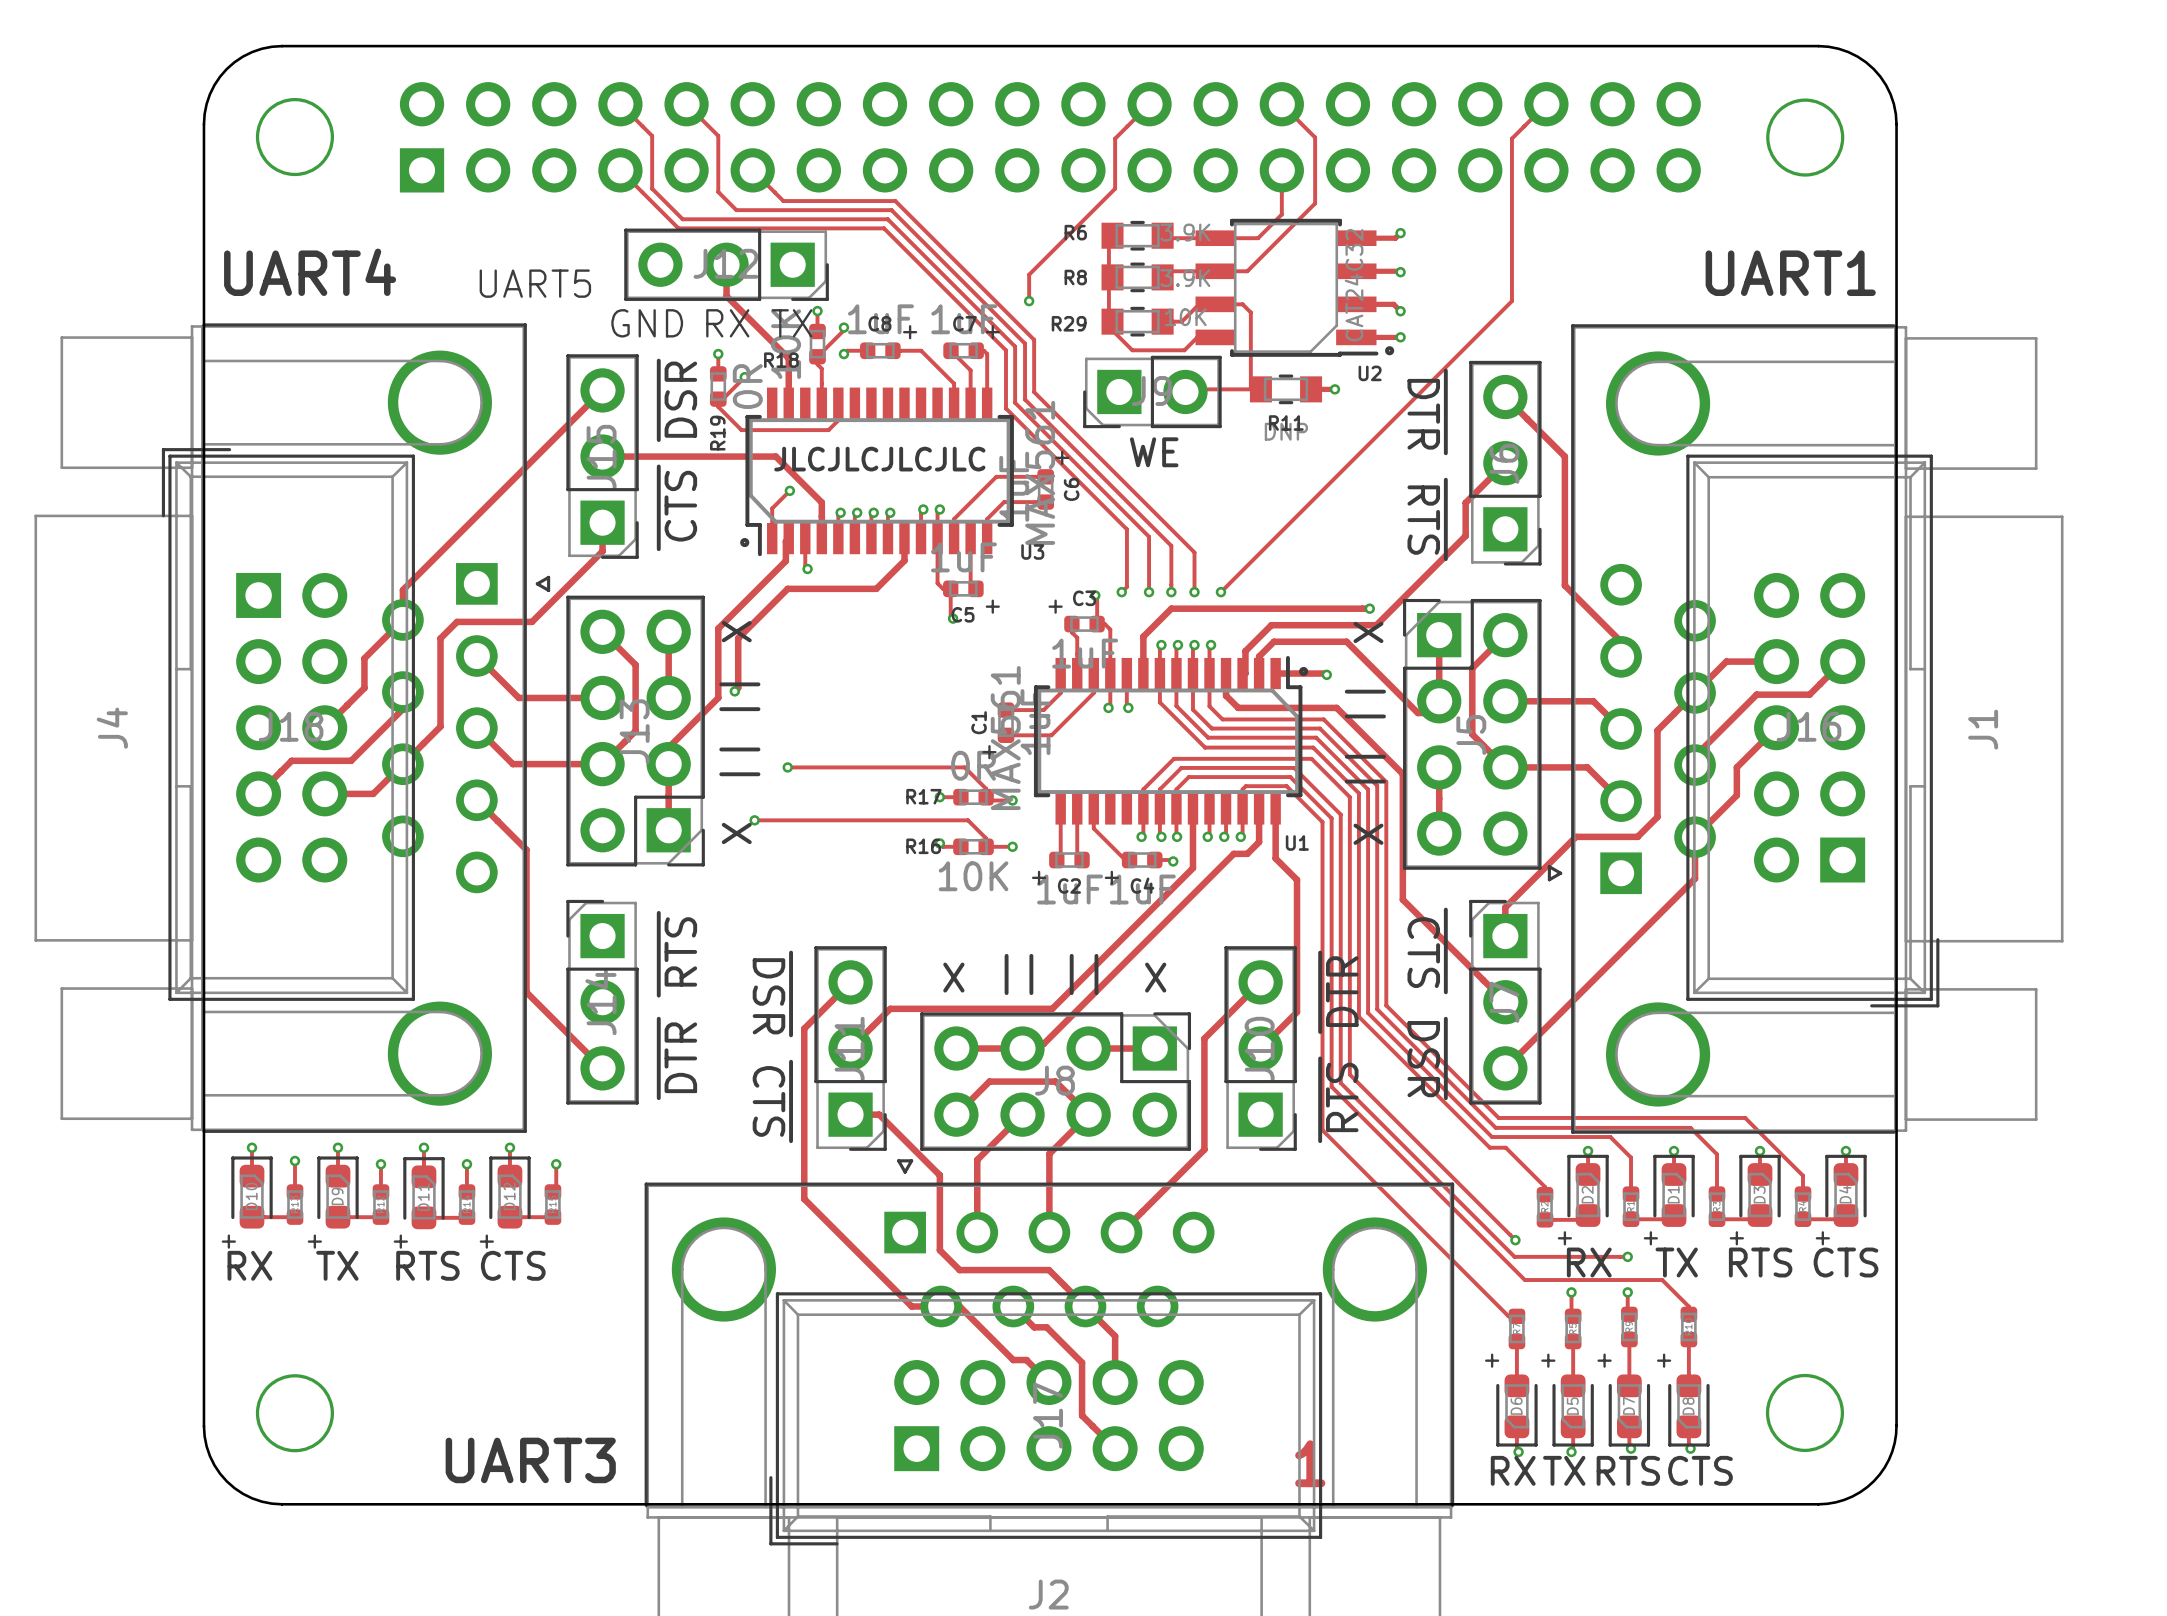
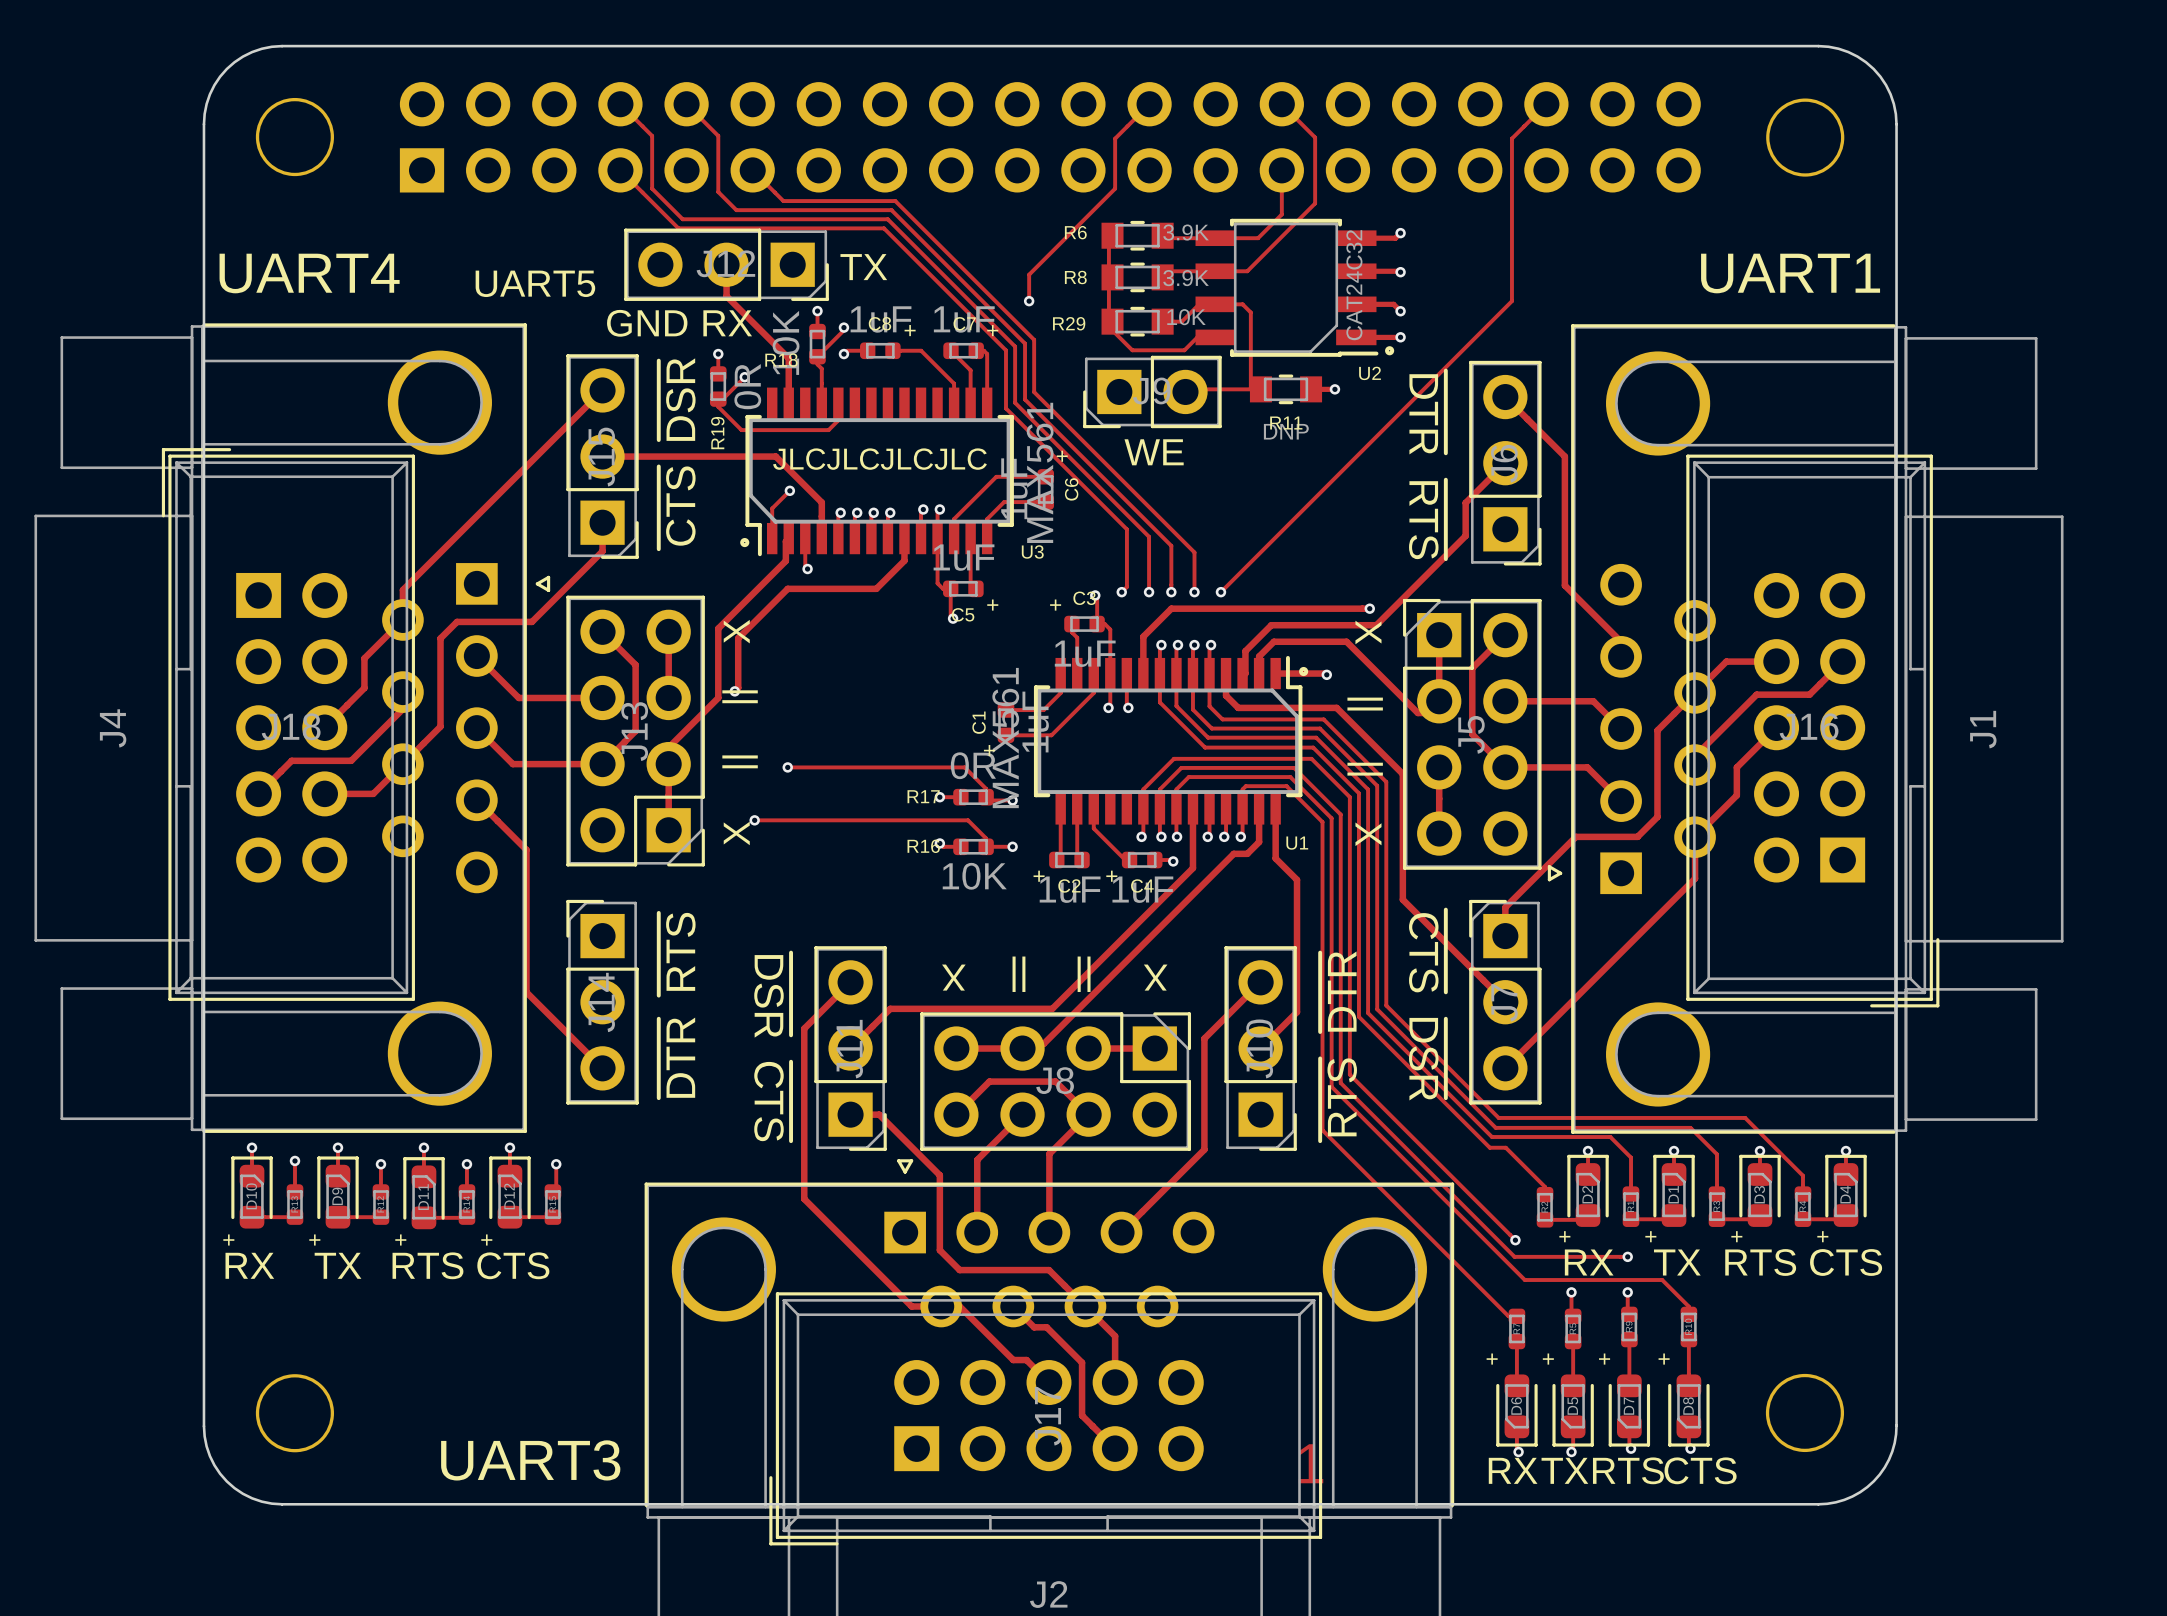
text position: TX (792, 323) -> TX (863, 267)

